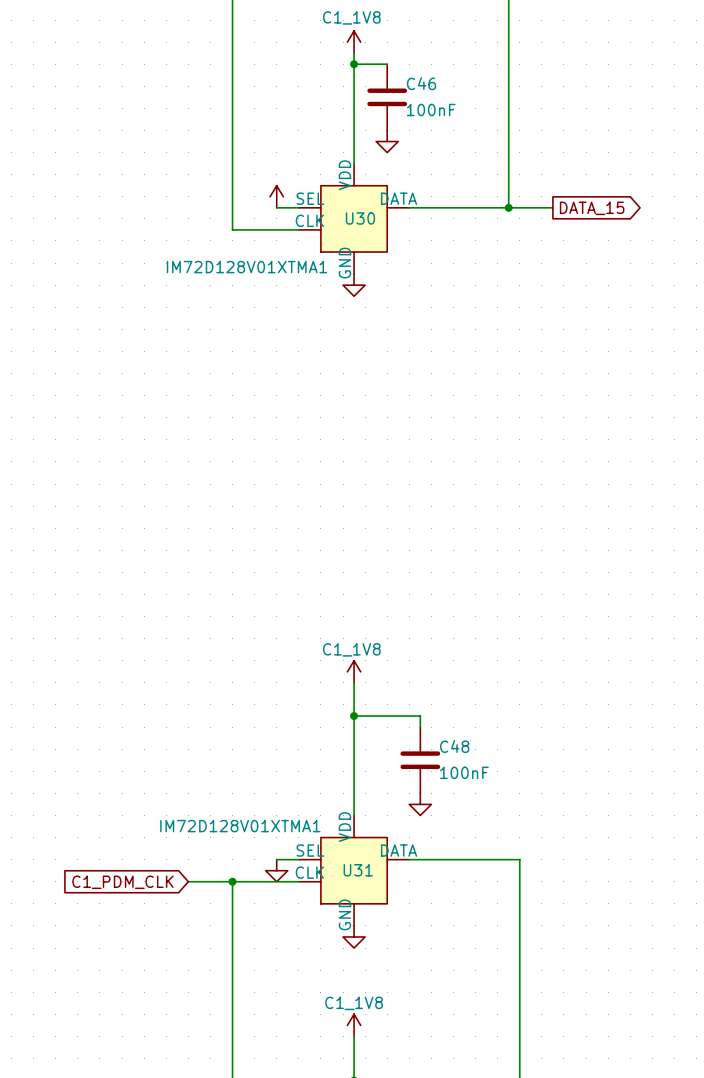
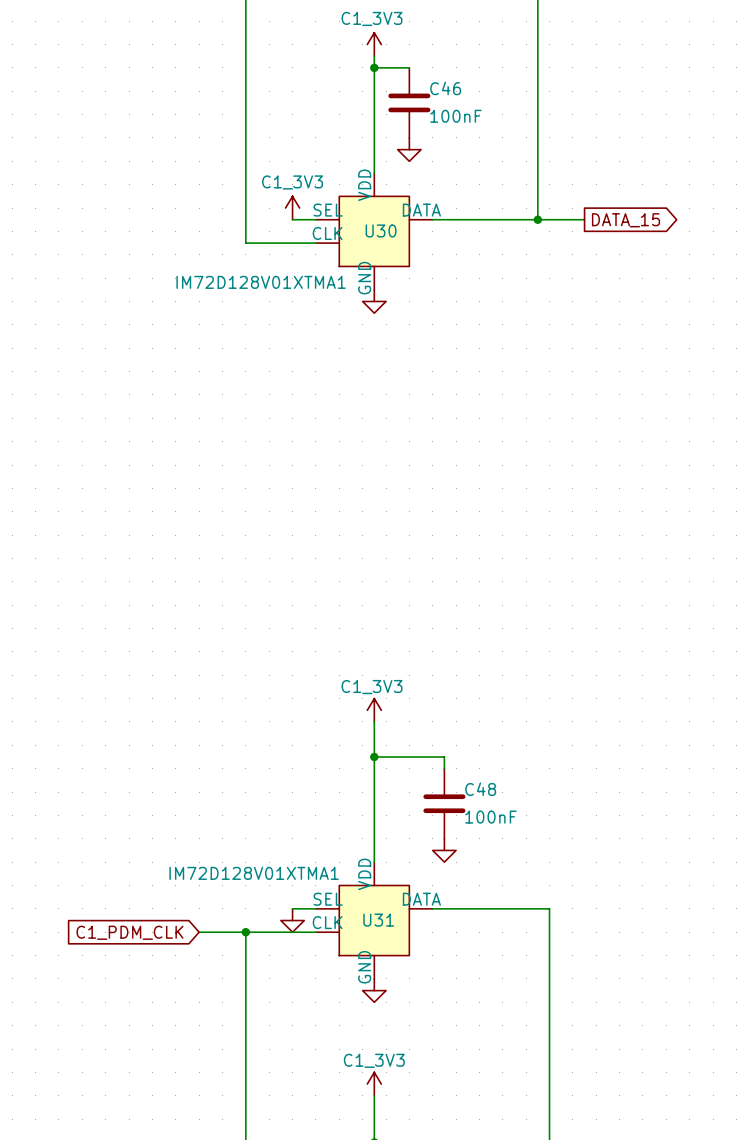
power symbol: C1_1V8 (354, 42) -> C1_3V3 (374, 44)
power symbol text: none -> C1_3V3 (292, 182)
power symbol: C1_1V8 (354, 671) -> C1_3V3 (374, 710)
power symbol: C1_1V8 (354, 1025) -> C1_3V3 (374, 1084)

